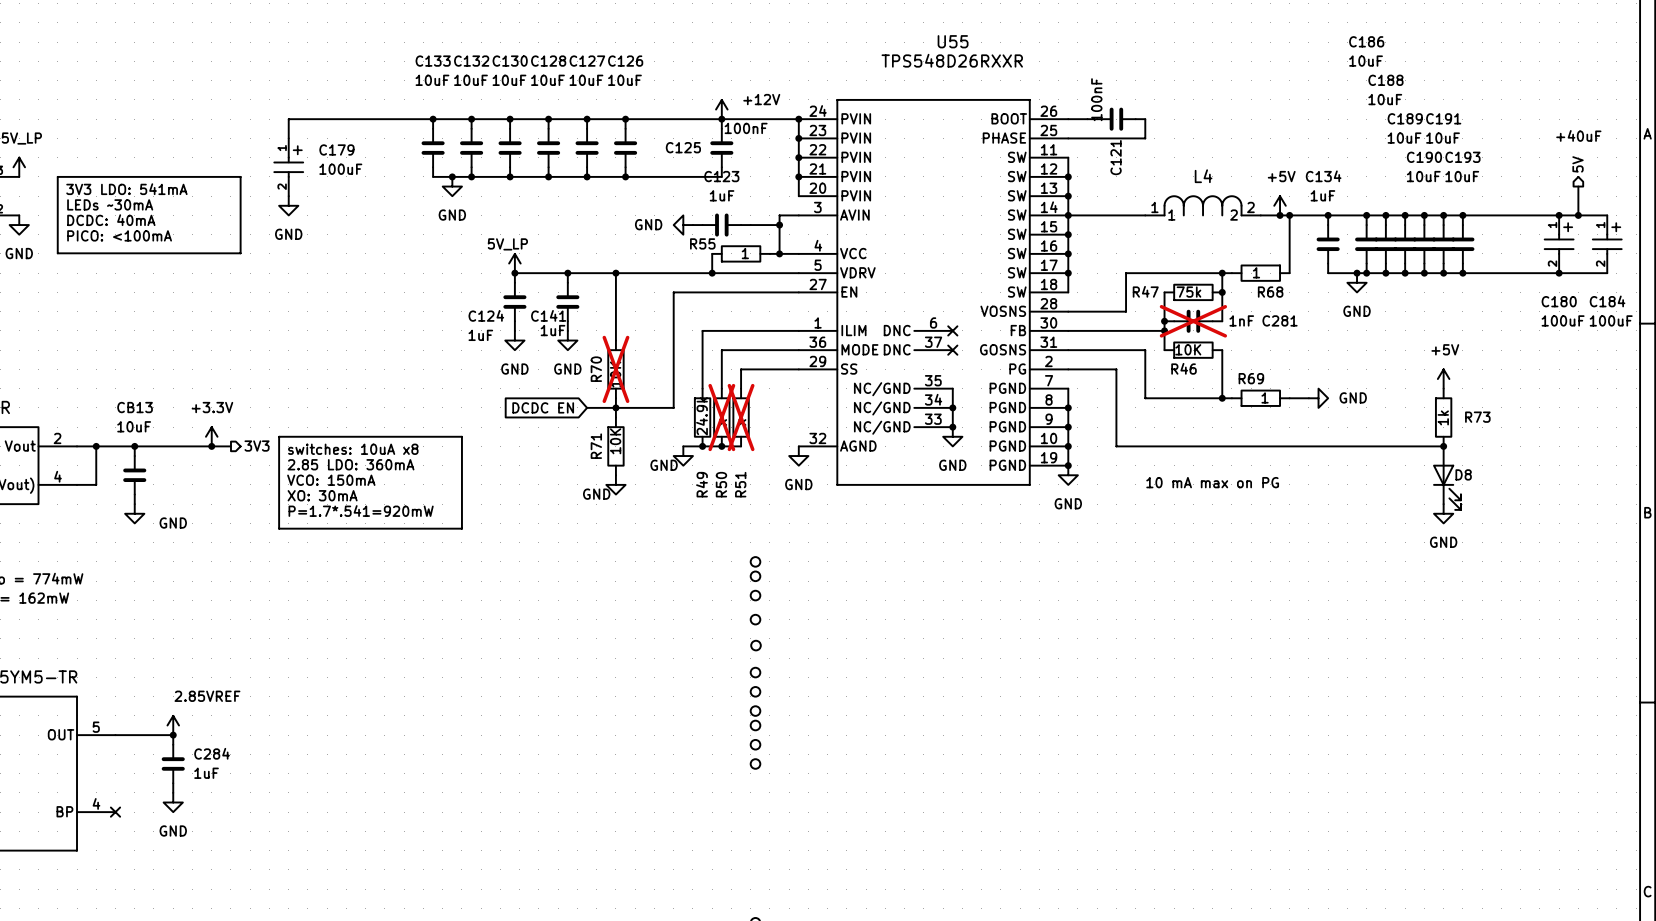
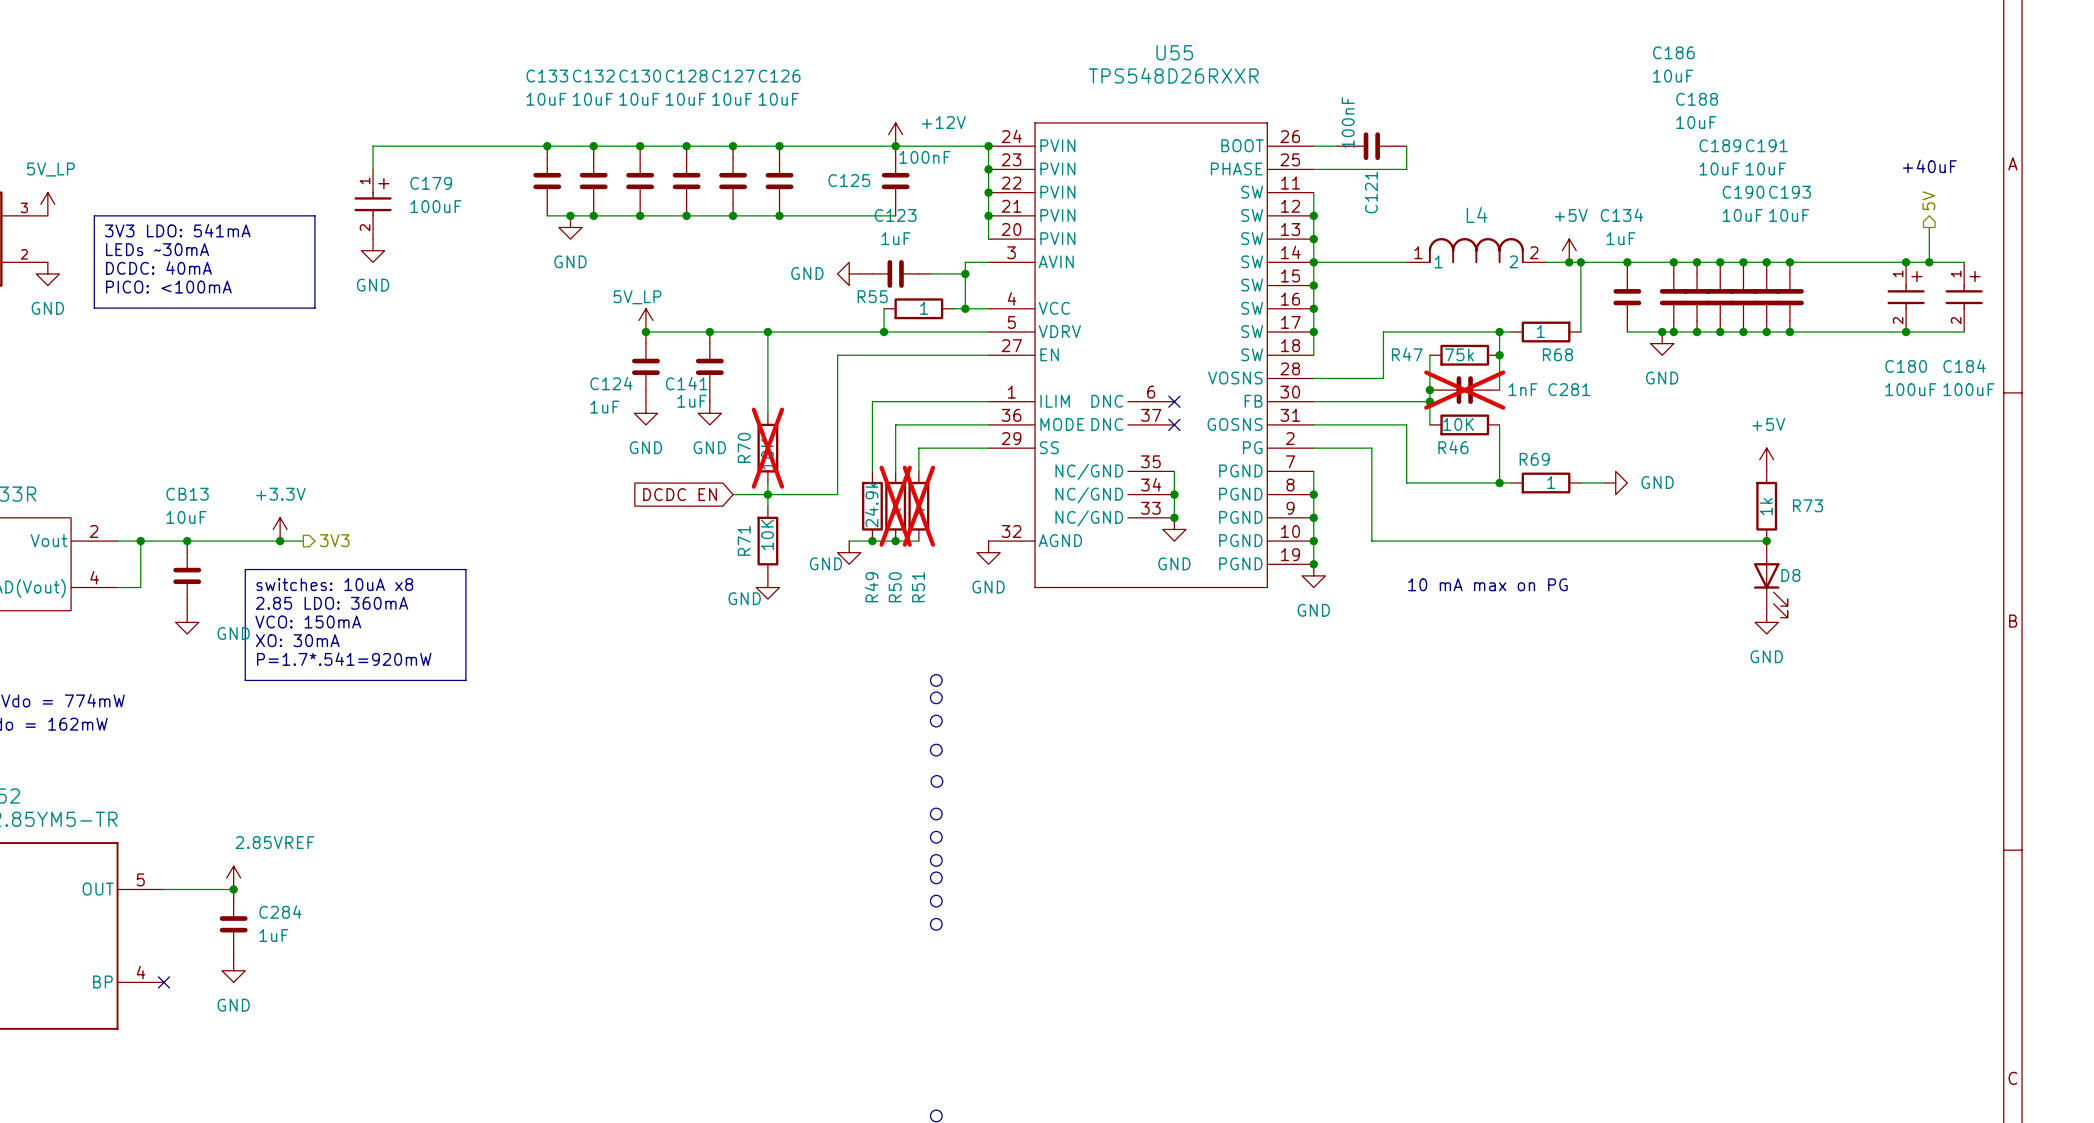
line: (279, 436) (461, 436) (461, 528) (279, 528) (279, 436) -> (245, 569) (465, 569) (465, 680) (245, 680) (245, 569)
text position: switches: 10uA x8 (353, 449) -> switches: 10uA x8 (334, 584)
text position: 2.85 LDO: 360mA (351, 464) -> 2.85 LDO: 360mA (332, 603)
text position: VCO: 150mA (331, 480) -> VCO: 150mA (308, 622)
text position: XO: 30mA (322, 495) -> XO: 30mA (297, 640)
text position: P=1.7*.541=920mW (361, 511) -> P=1.7*.541=920mW (344, 659)

